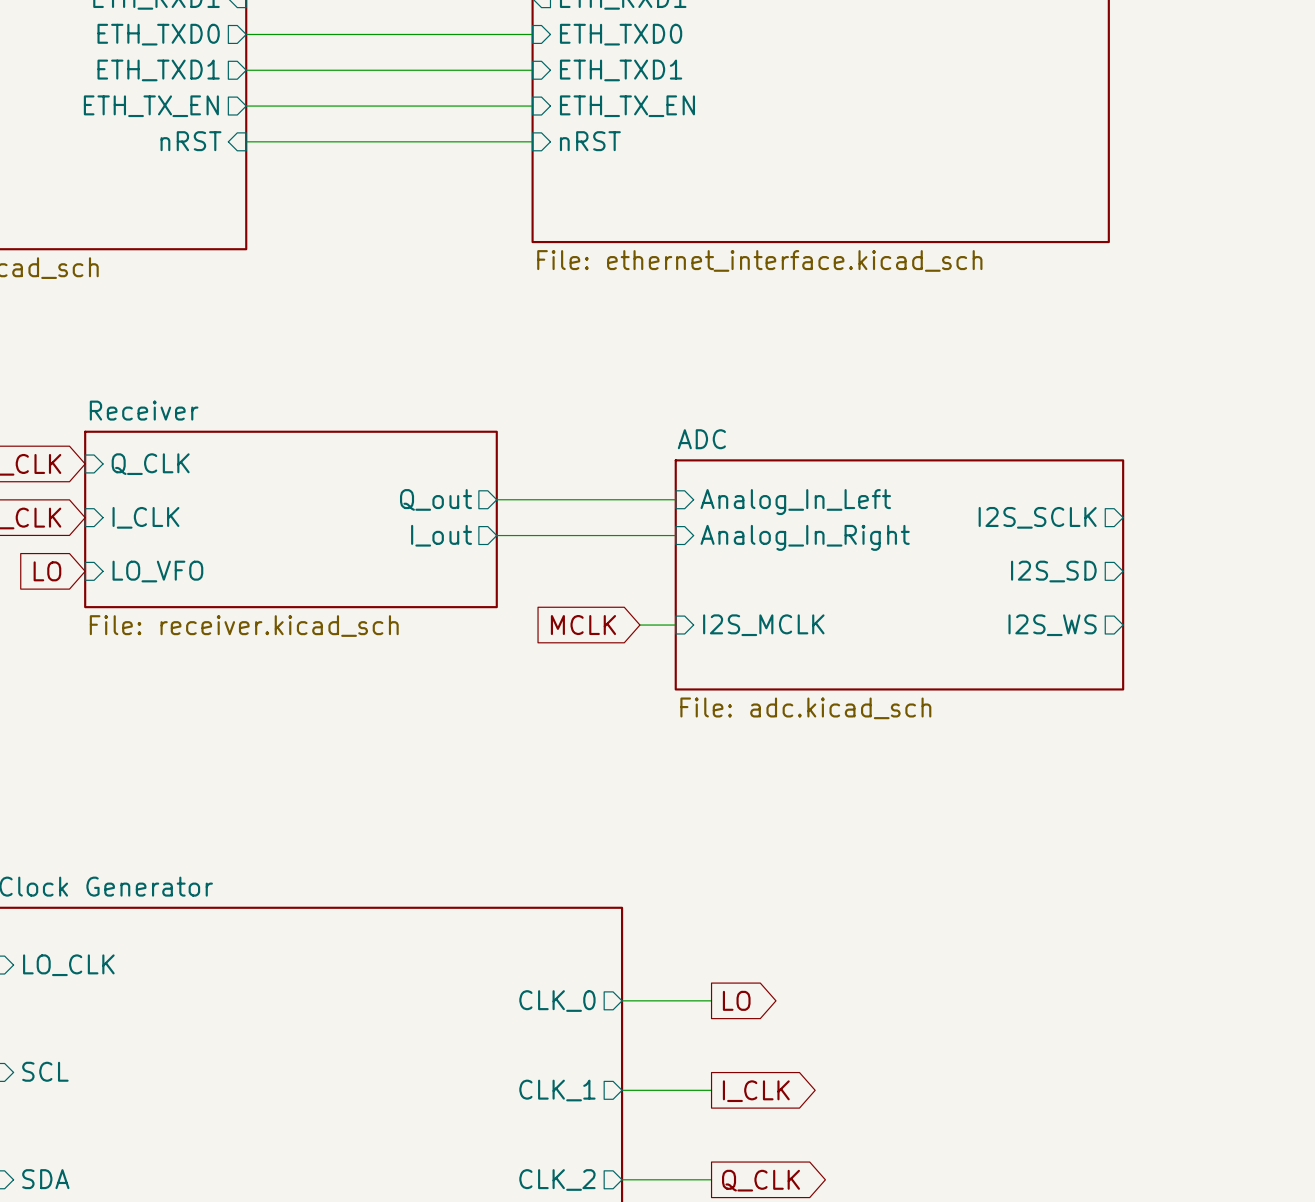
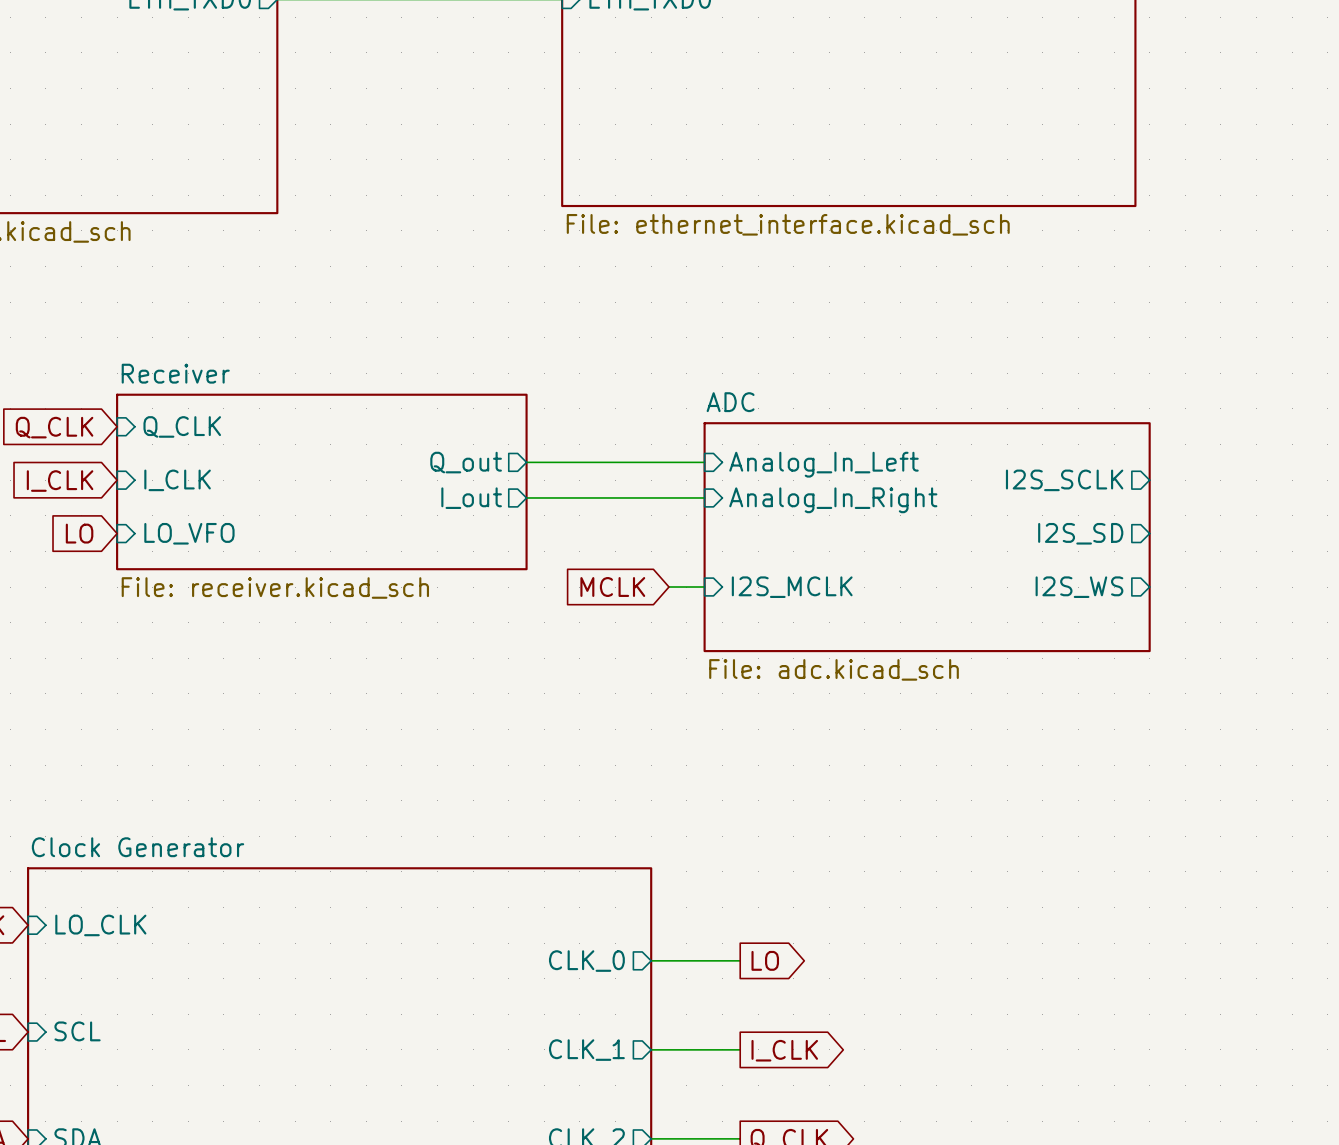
sheet pin: ETH_TXD1 (158, 70) -> none
wire: (246, 70) (532, 70) -> none
sheet pin: ETH_TXD1 (621, 70) -> none
sheet pin: ETH_TX_EN (151, 106) -> none
wire: (246, 106) (532, 106) -> none
sheet pin: ETH_TX_EN (627, 106) -> none
sheet pin: nRST (190, 141) -> none
wire: (246, 141) (532, 141) -> none
sheet pin: nRST (590, 141) -> none

